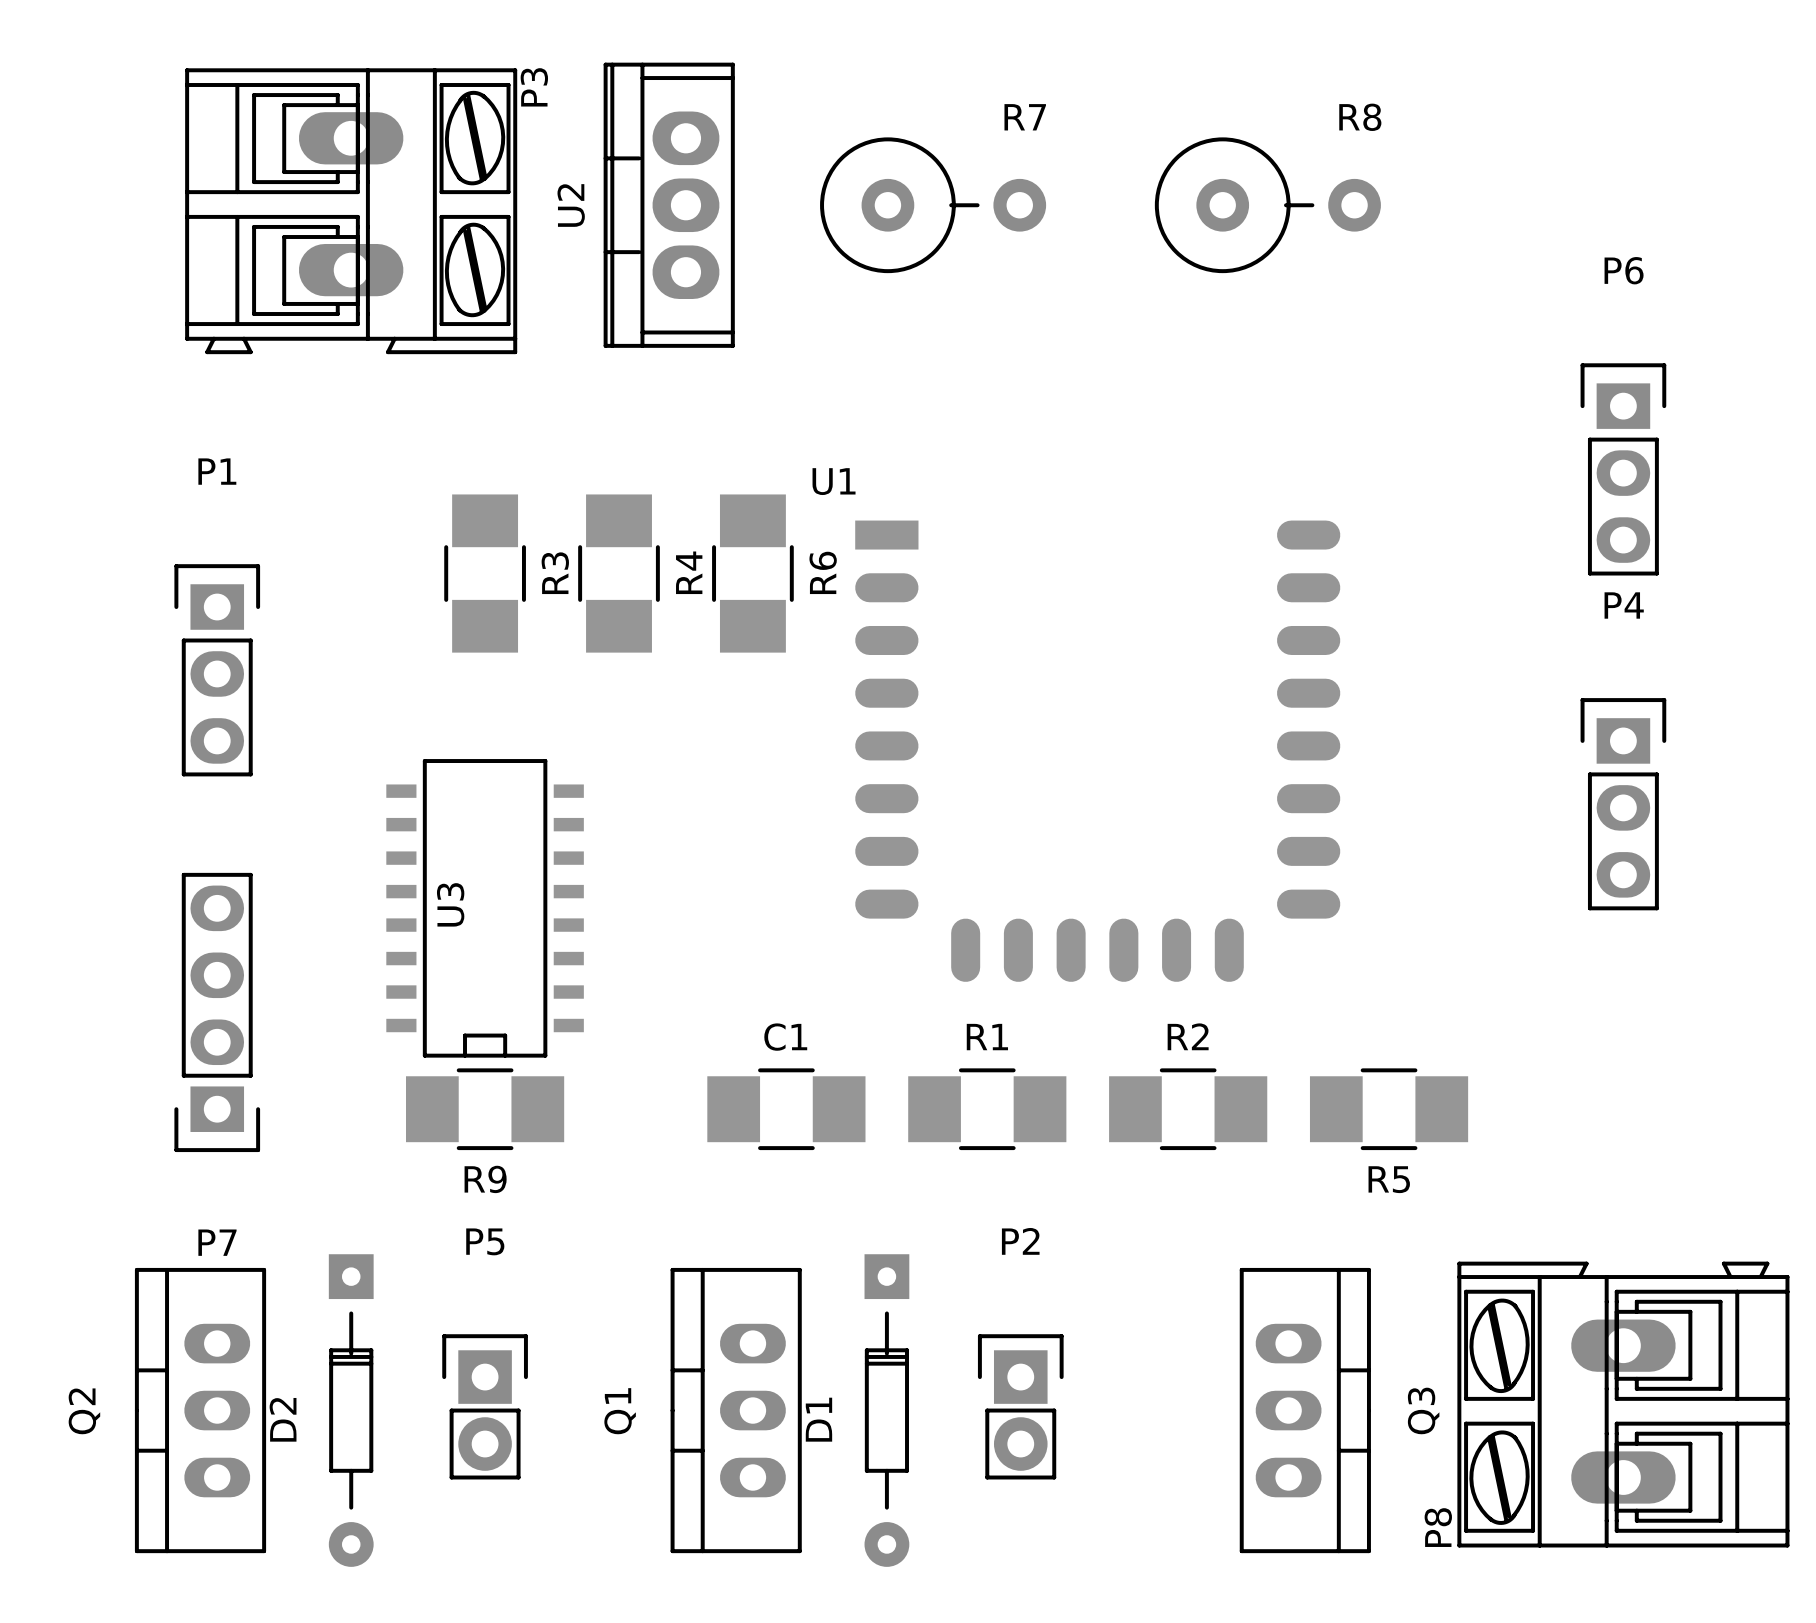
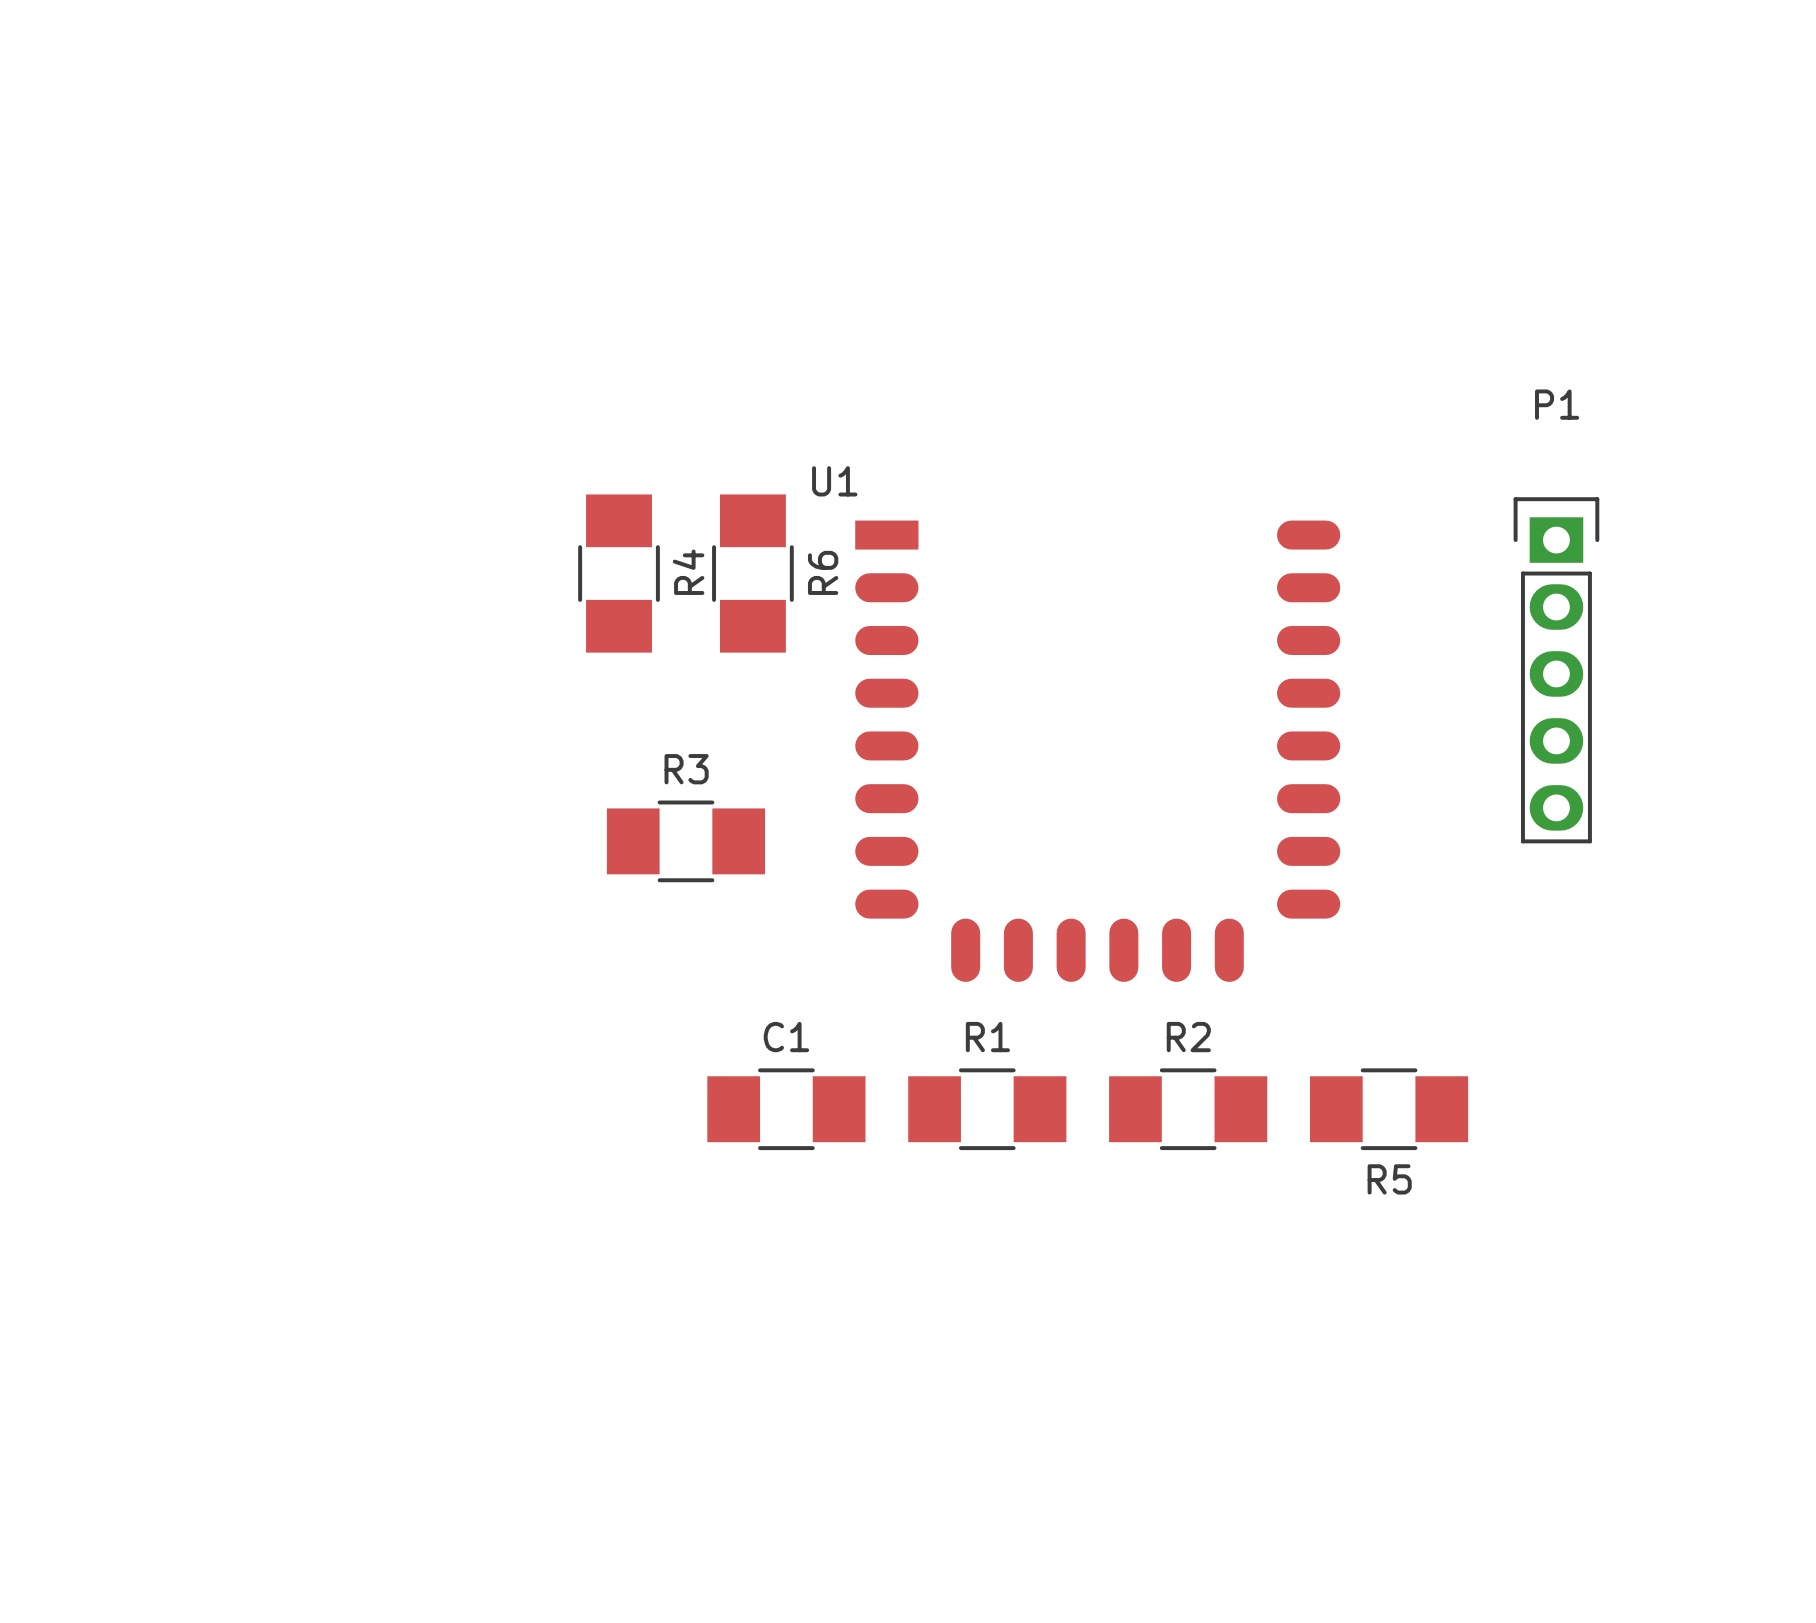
U2: (669, 205) -> none
R7: (933, 205) -> none
R8: (1267, 205) -> none
P3: (351, 211) -> none
P6: (1623, 469) -> none
P1 name position: P1 (217, 471) -> P1 (1557, 404)
P1 footprint: [174, 564, 261, 777] -> [1513, 497, 1600, 844]
R3 rotation: 0° (485, 573) -> 90° clockwise (685, 841)
R3 position: (485, 573) -> (685, 841)
R3 name position: R3 (555, 573) -> R3 (686, 769)
P4: (1623, 804) -> none
U3: (485, 908) -> none
P7: (217, 1012) -> none
R9: (485, 1109) -> none
P8: (1623, 1404) -> none
P5: (485, 1406) -> none
P2: (1020, 1406) -> none
Q2: (200, 1410) -> none
D2: (351, 1410) -> none
Q1: (736, 1410) -> none
D1: (886, 1410) -> none
Q3: (1305, 1410) -> none

